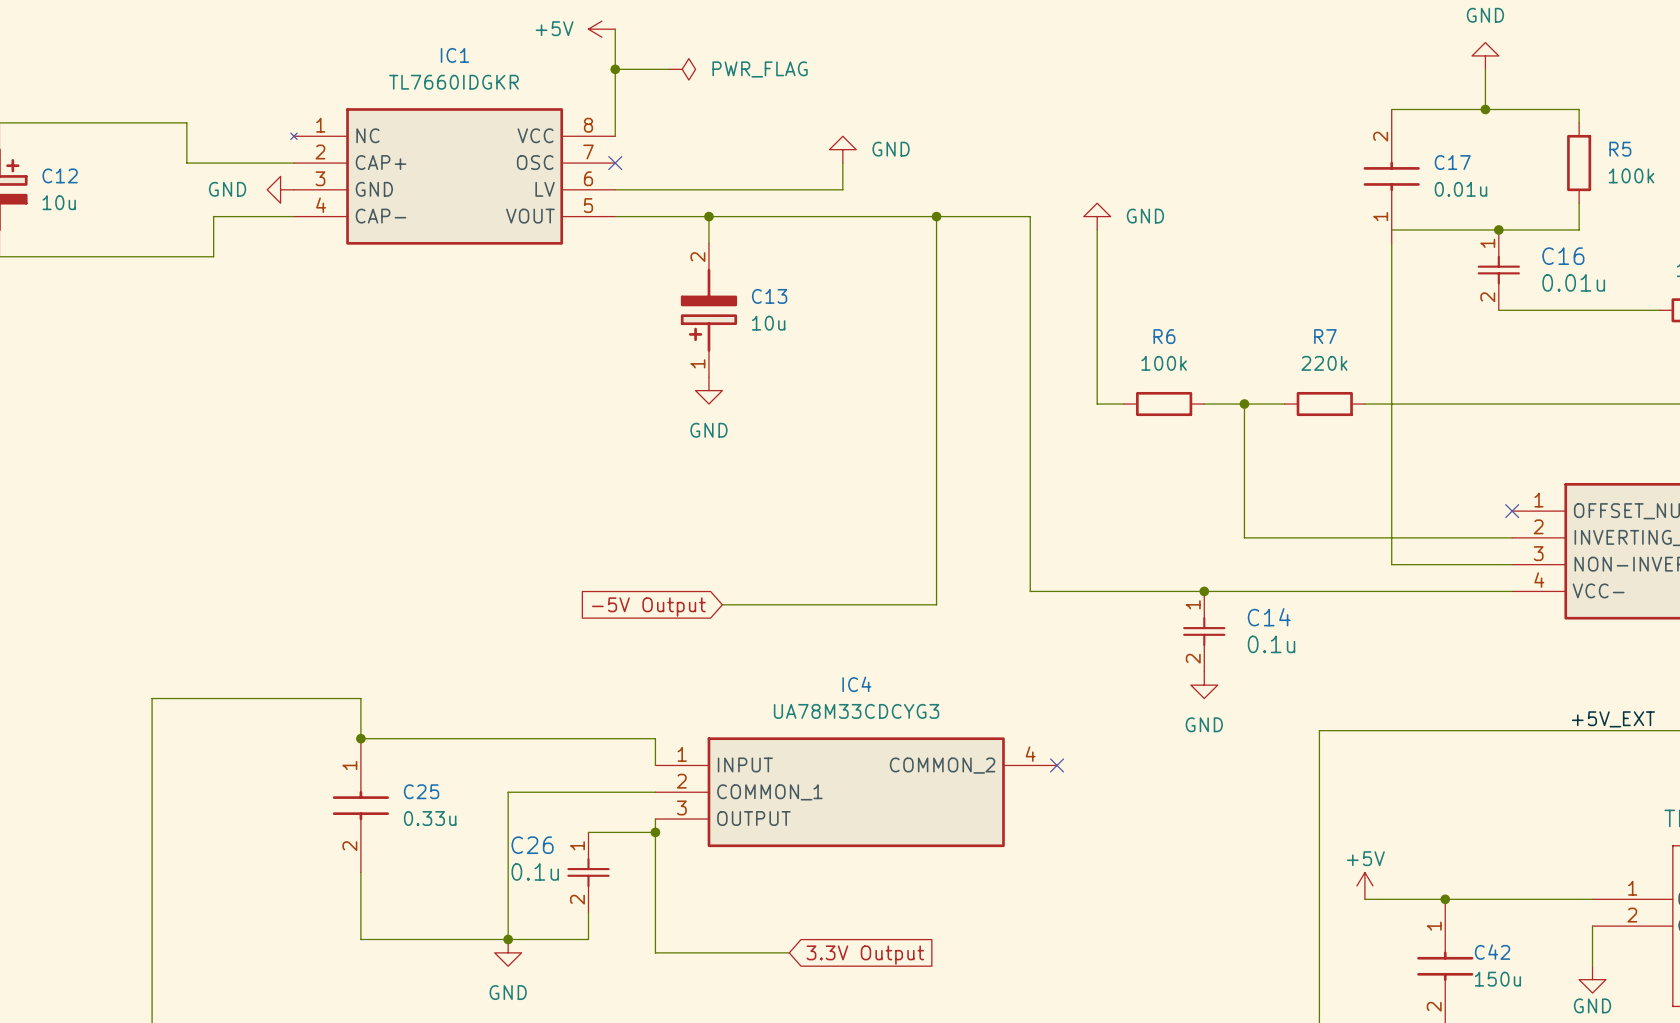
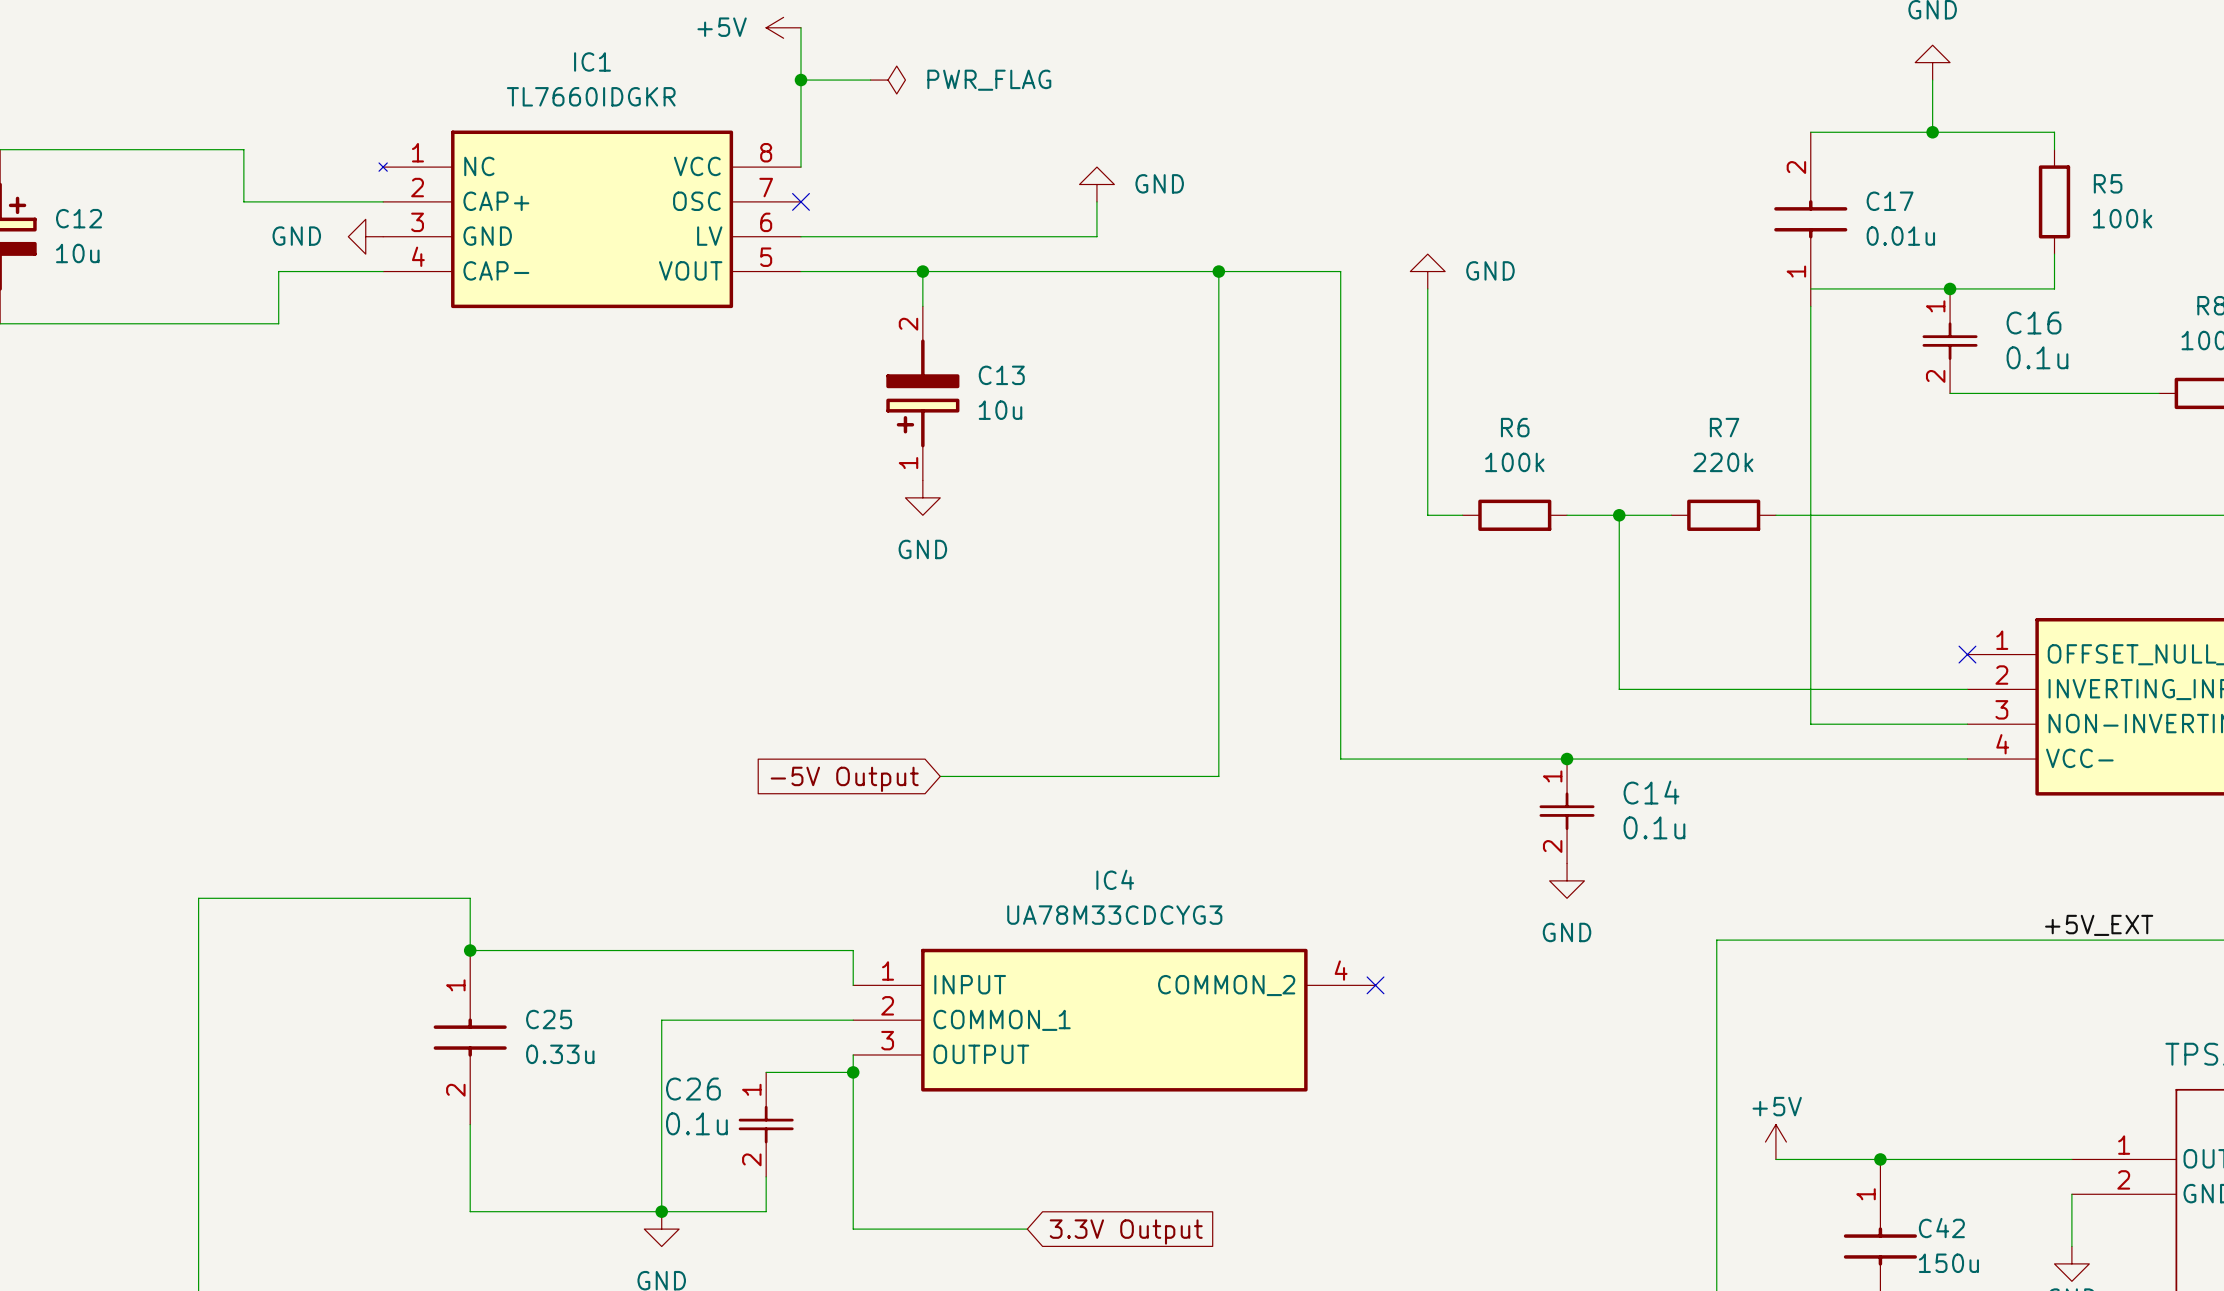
C16 value: 0.01u (1573, 282) -> 0.1u (2037, 357)

